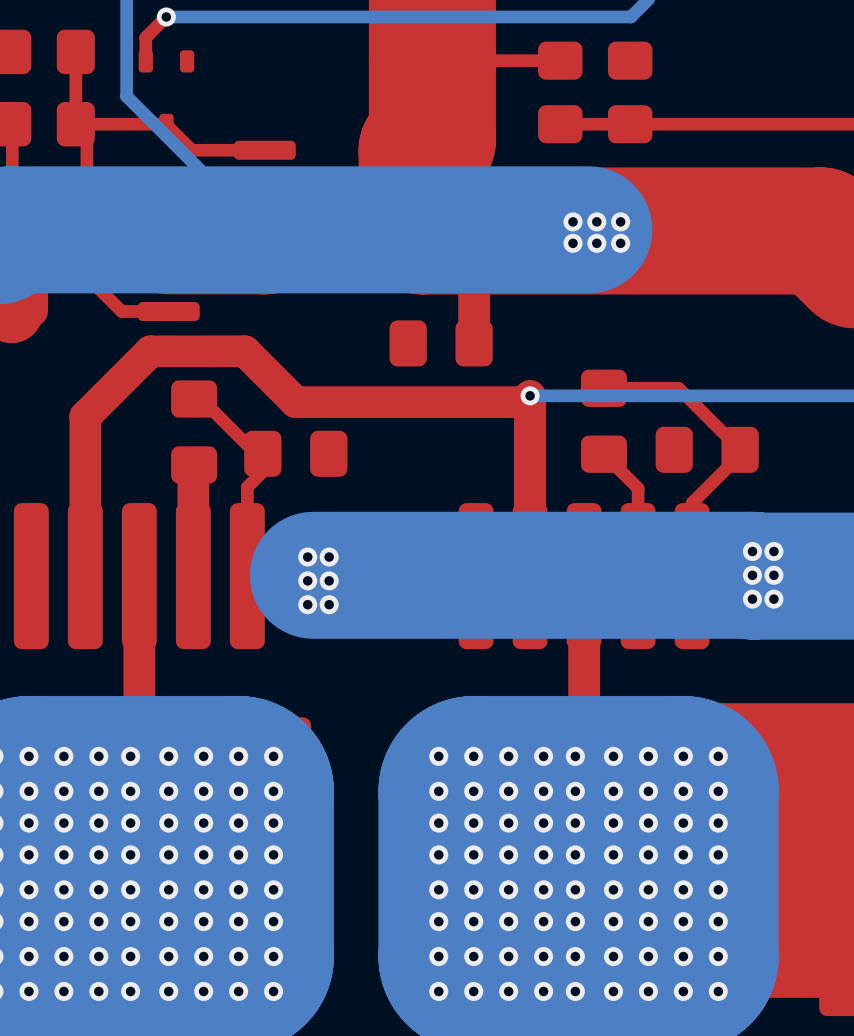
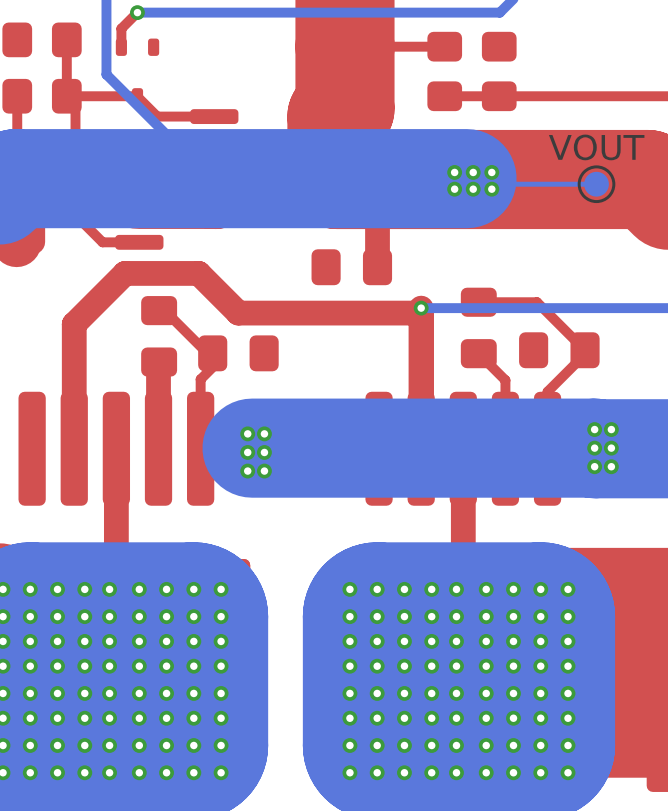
bottom track: none -> (596, 184) (496, 184) (491, 189)
VOUT: none -> (596, 184)

